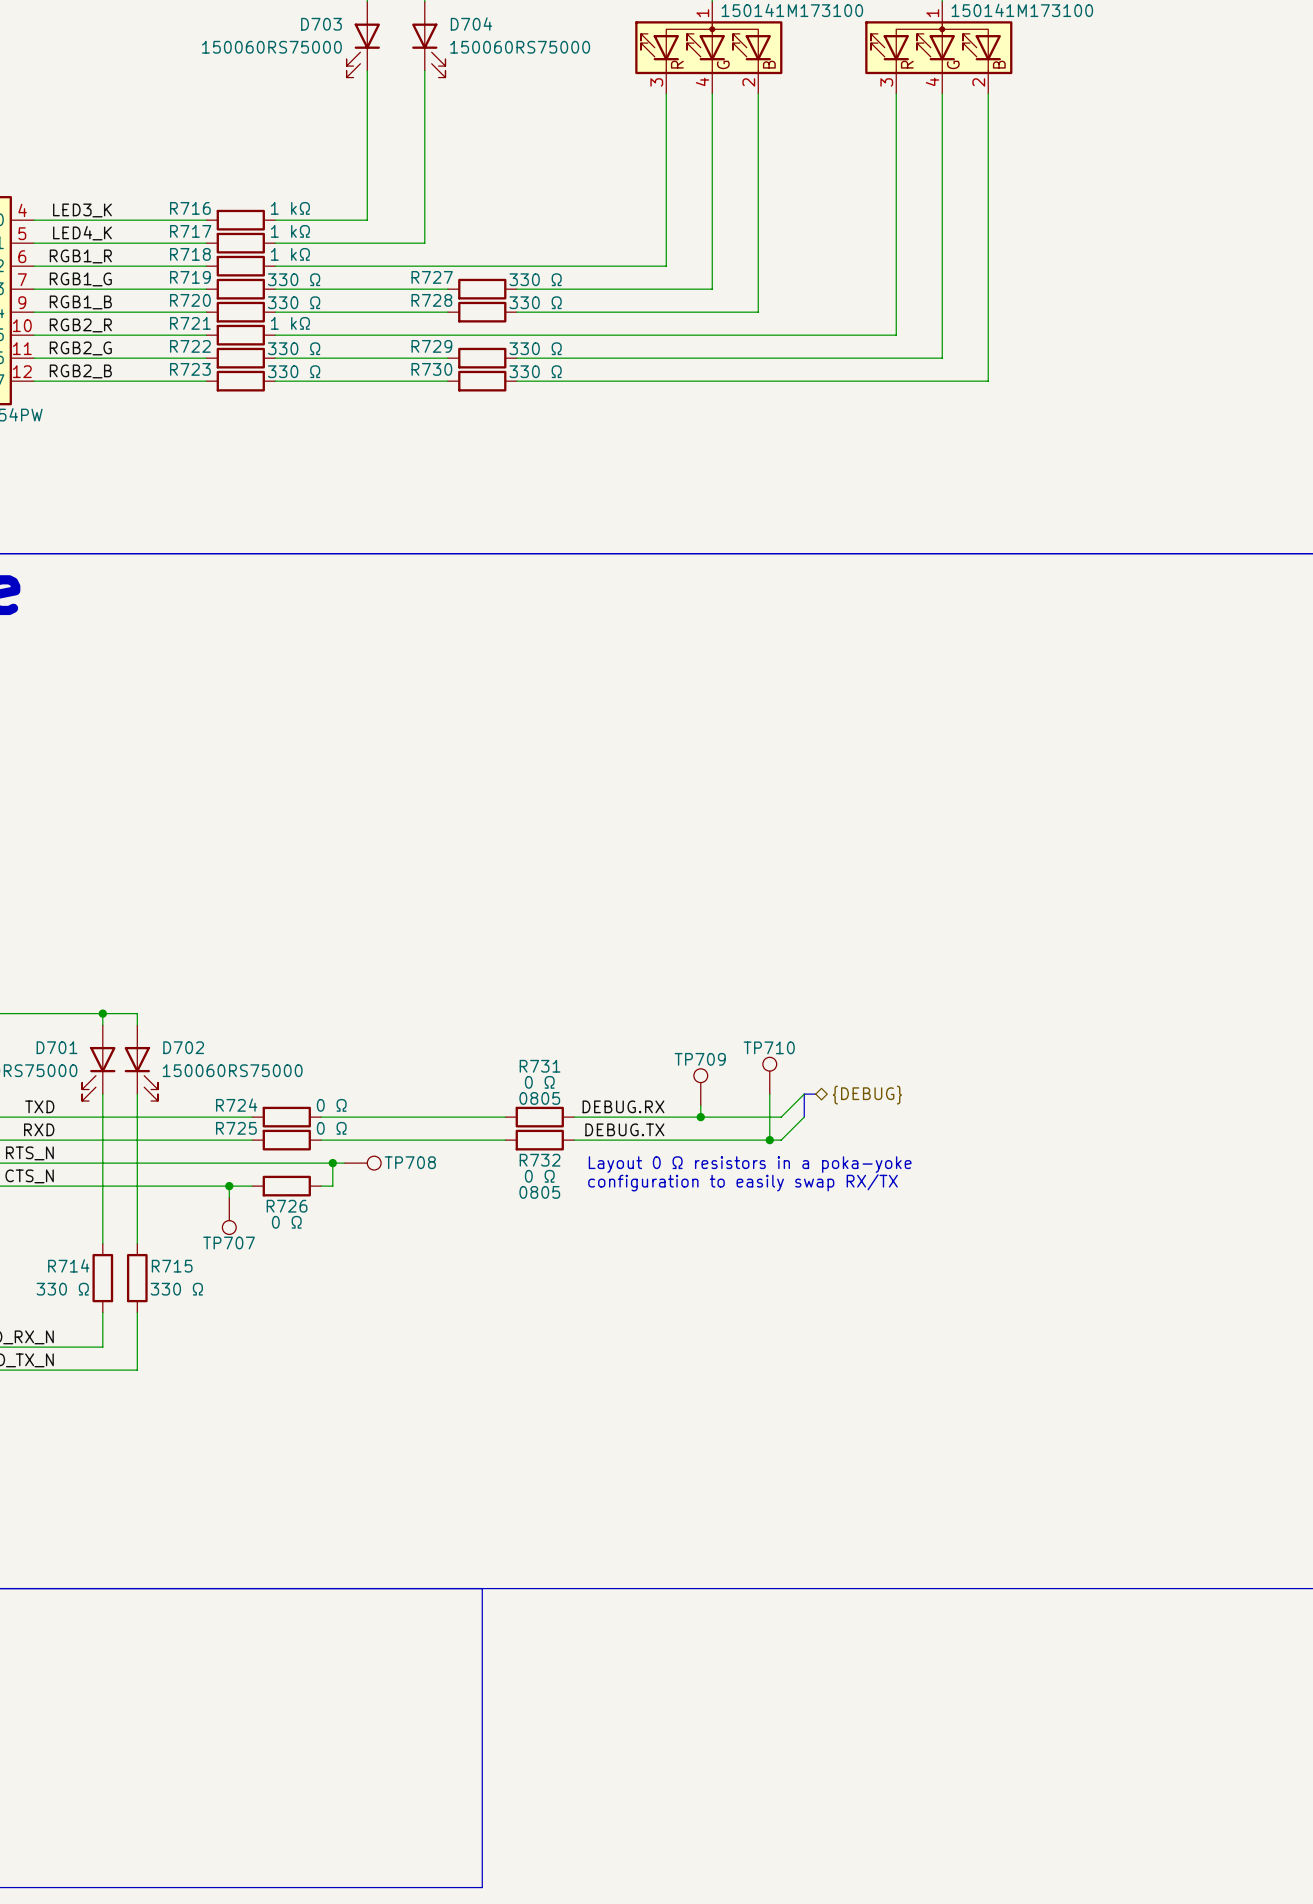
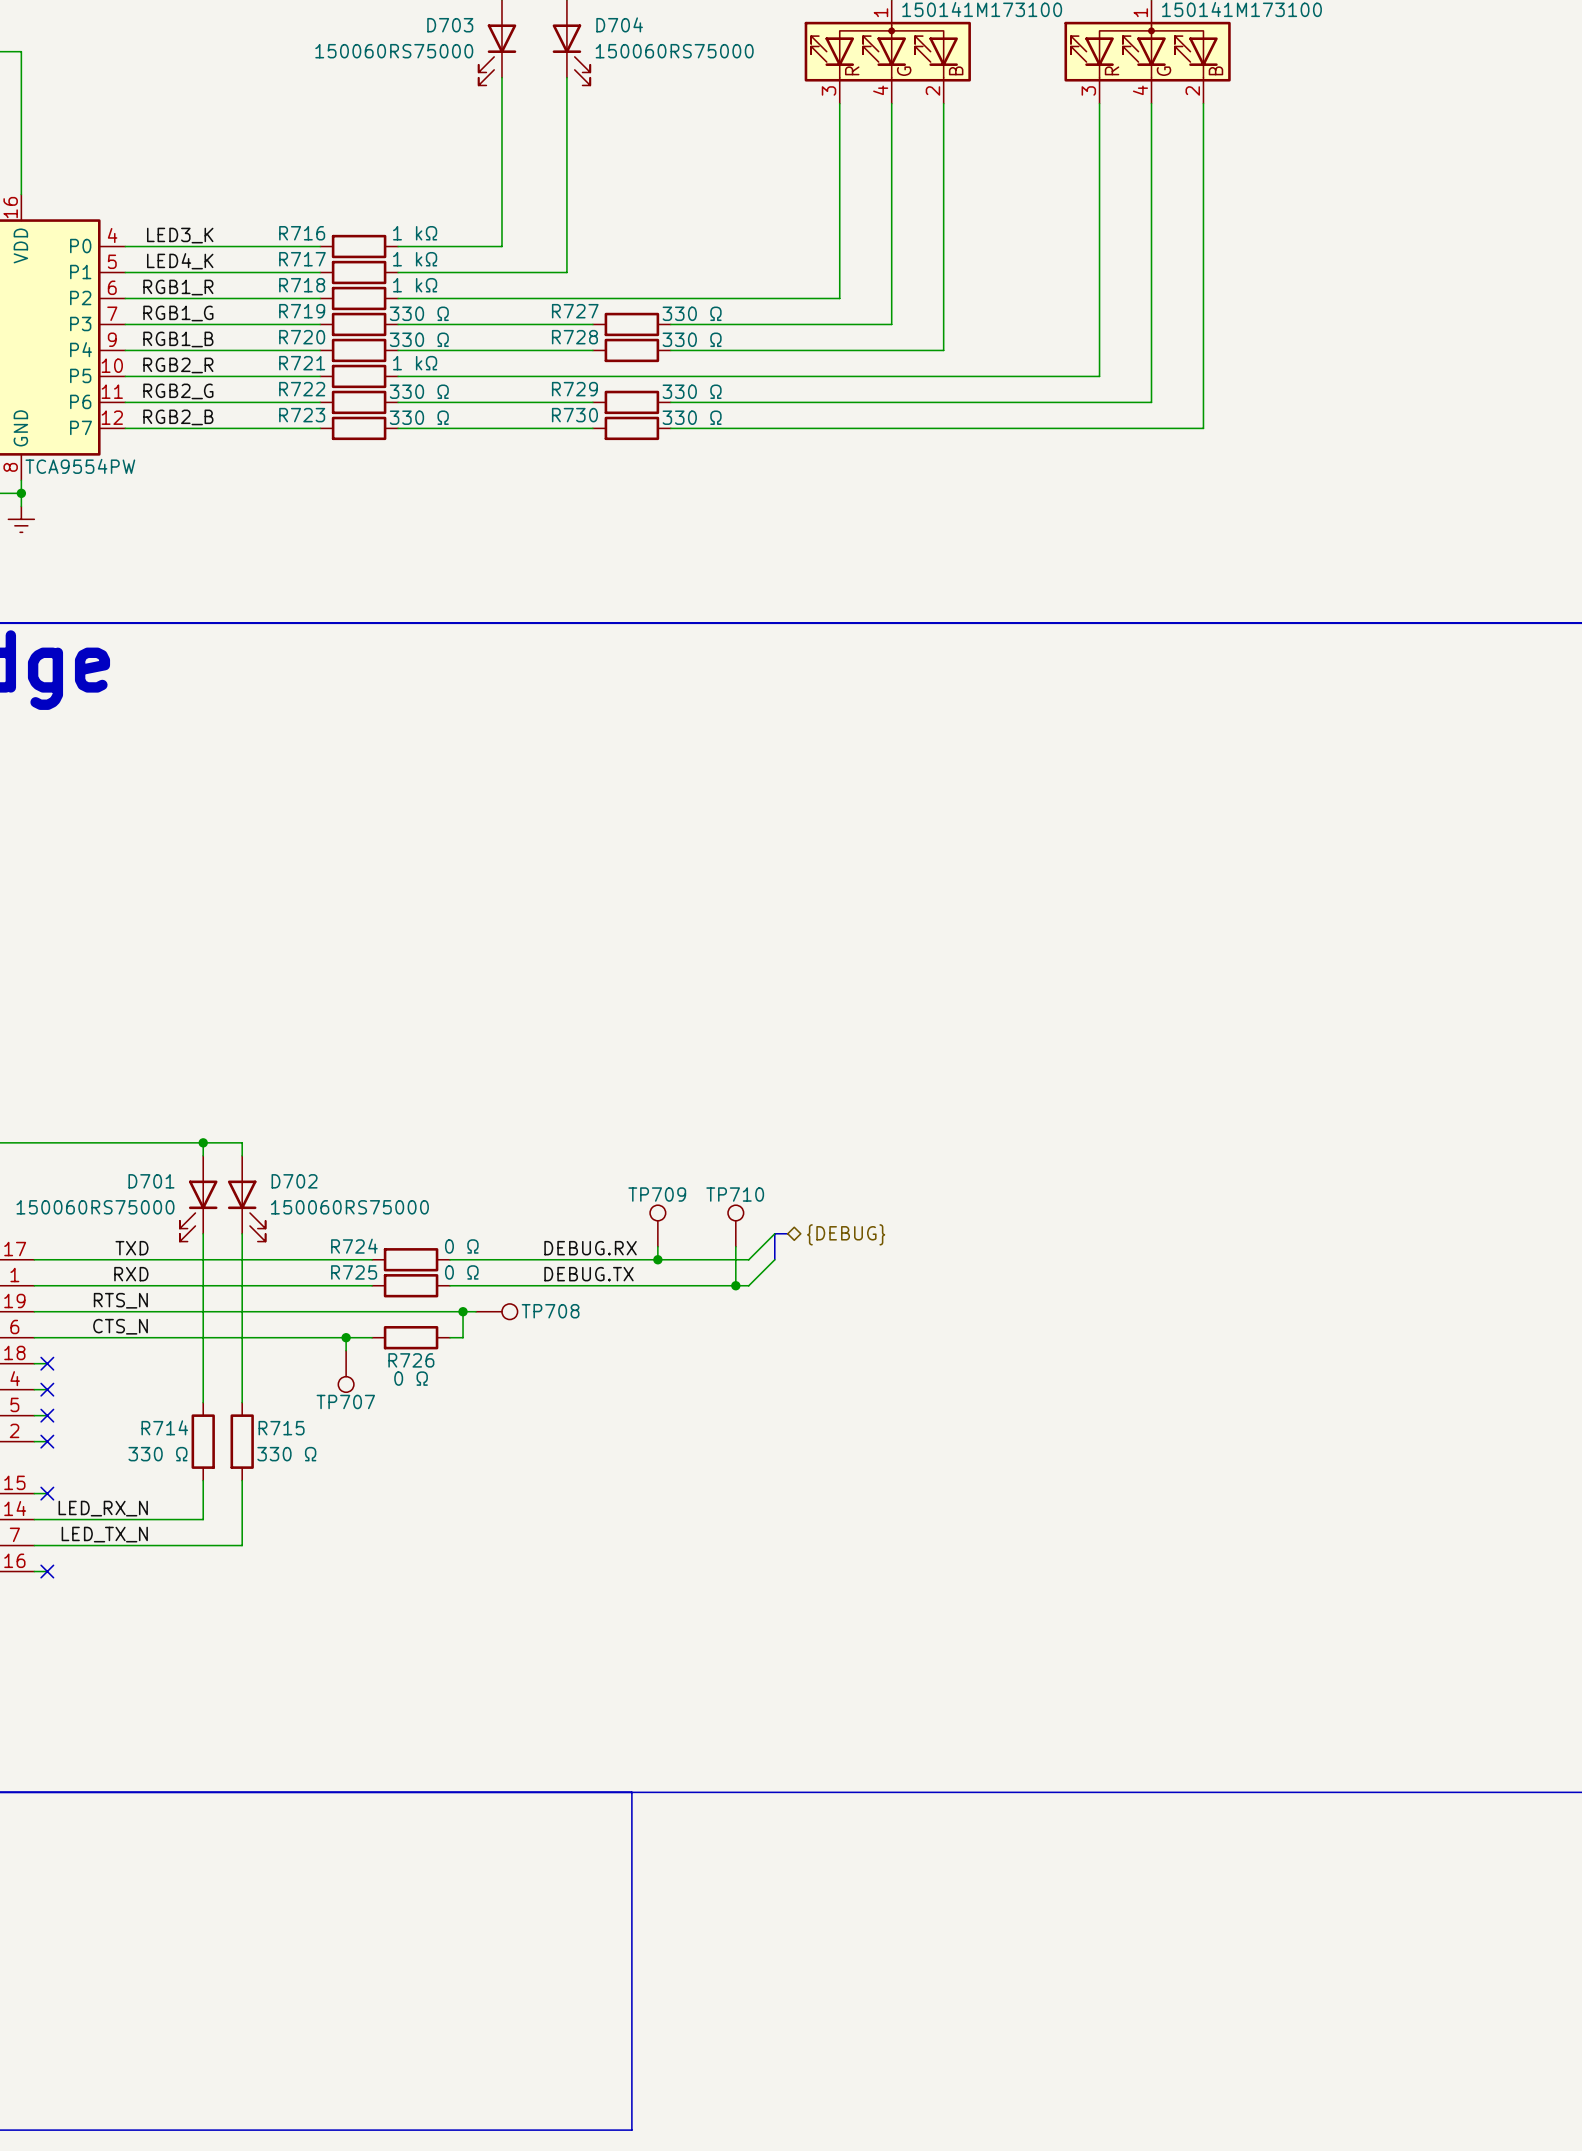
TP710 position: (769, 1075) -> (735, 1225)
TP709 position: (700, 1087) -> (657, 1225)
wire: (769, 1094) (769, 1140) -> none
wire: (804, 1094) (781, 1117) (585, 1117) -> (774, 1233) (748, 1259)
bus: (815, 1094) (804, 1094) (804, 1117) -> (787, 1233) (774, 1233) (774, 1259)
hierarchical label position: {DEBUG} (867, 1095) -> {DEBUG} (846, 1234)
wire: none -> (657, 1246) (657, 1259) (735, 1259)
wire: none -> (735, 1246) (735, 1285) (657, 1285)
wire: (700, 1105) (700, 1117) -> none
label: none -> DEBUG.RX (590, 1248)
label: DEBUG.RX (623, 1106) -> none
junction: none -> (657, 1259)
R731: 0 Ω (539, 1117) -> none
junction: (700, 1117) -> none
wire: (804, 1117) (781, 1140) (585, 1140) -> (774, 1259) (748, 1285)
label: none -> DEBUG.TX (589, 1274)
label: DEBUG.TX (624, 1129) -> none
R732: 0 Ω (539, 1140) -> none
junction: none -> (735, 1285)
junction: (769, 1140) -> none
text: Layout 0 Ω resistors in a poka-yoke (750, 1164) -> none
text: configuration to easily swap RX/TX (743, 1182) -> none

